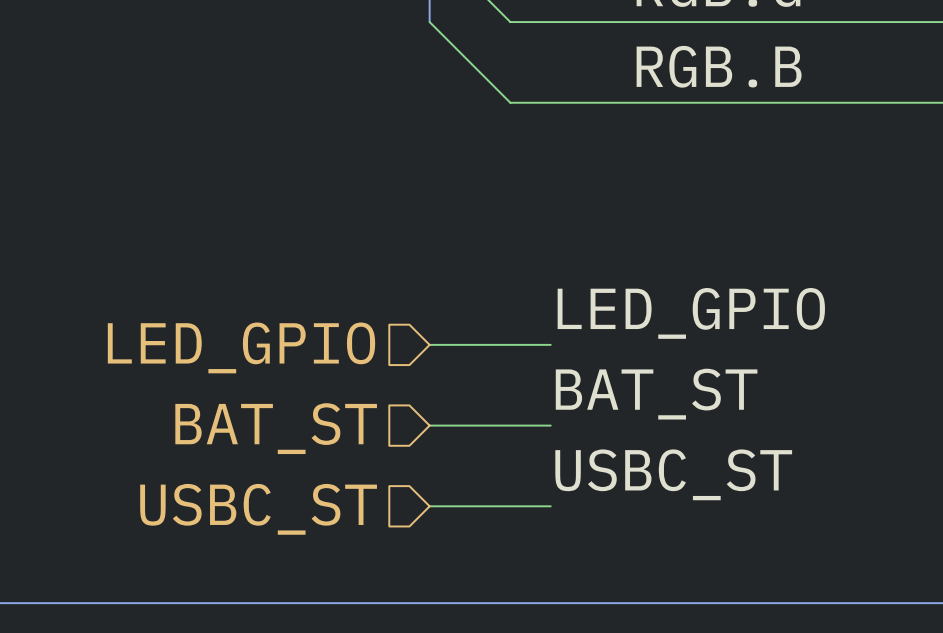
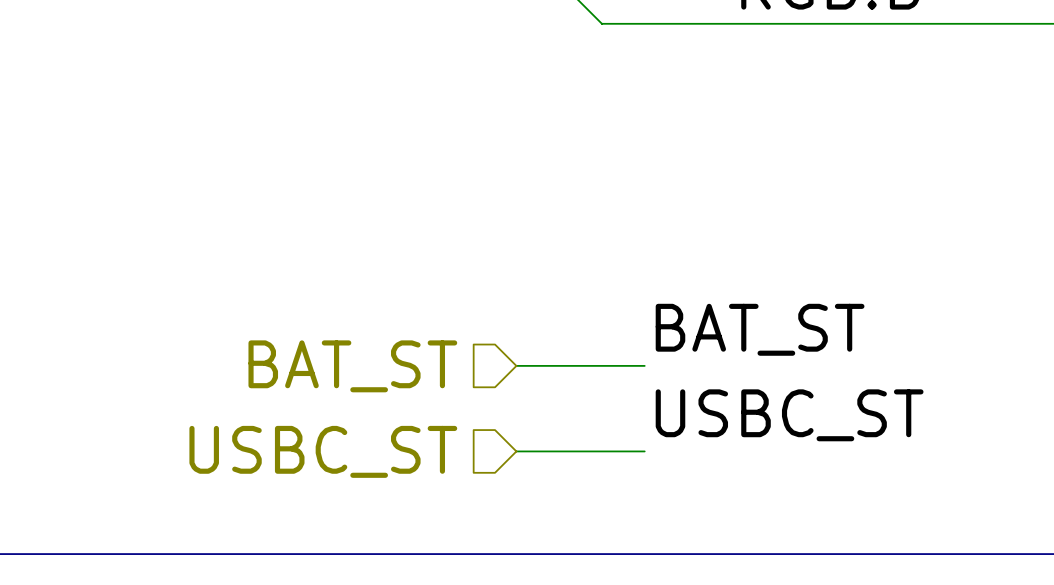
label: LED_GPIO (691, 313) -> none
wire: (429, 344) (550, 344) -> none
hierarchical label: LED_GPIO (241, 347) -> none

